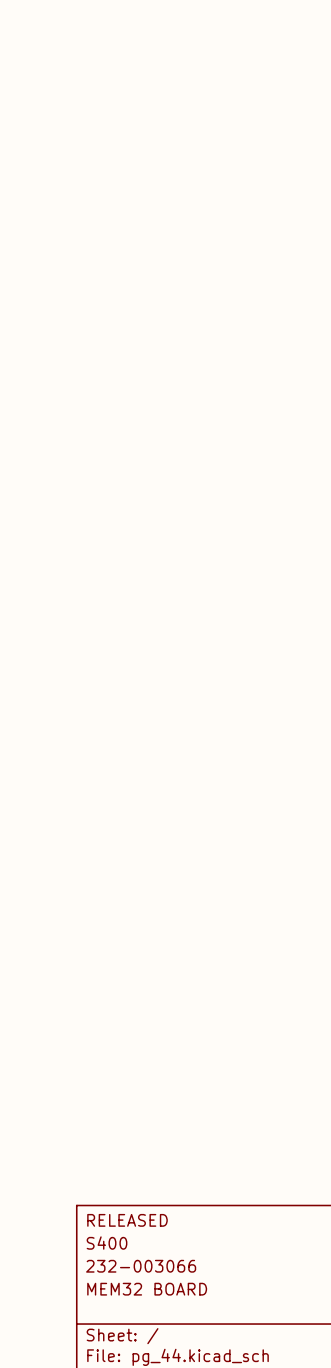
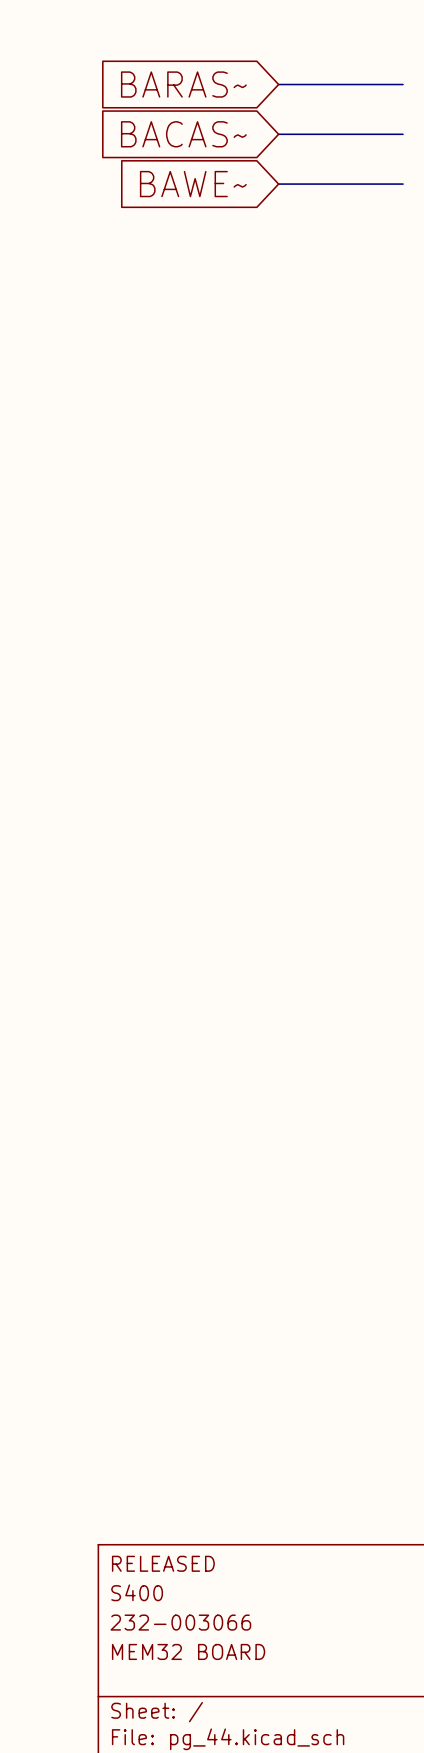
global label: none -> BARAS~ (183, 84)
wire: none -> (278, 84) (403, 84)
global label: none -> BACAS~ (183, 134)
wire: none -> (278, 134) (403, 134)
global label: none -> BAWE~ (193, 184)
wire: none -> (278, 184) (403, 184)

